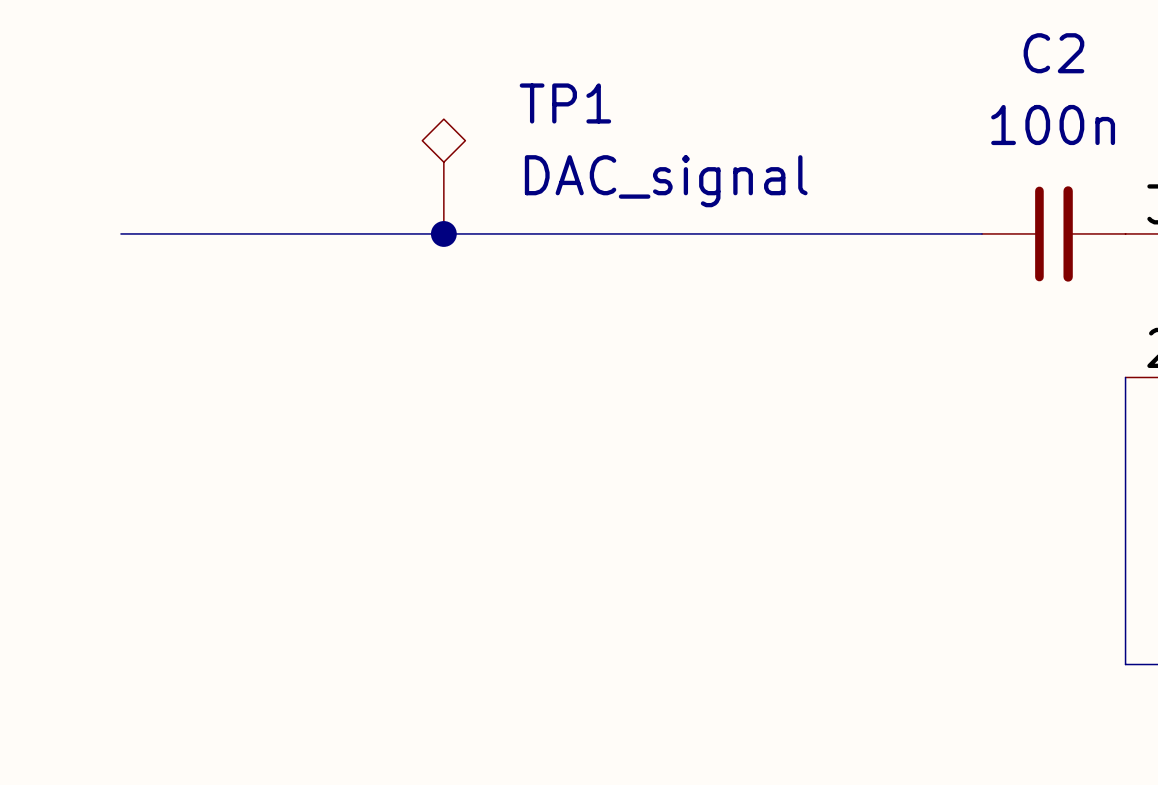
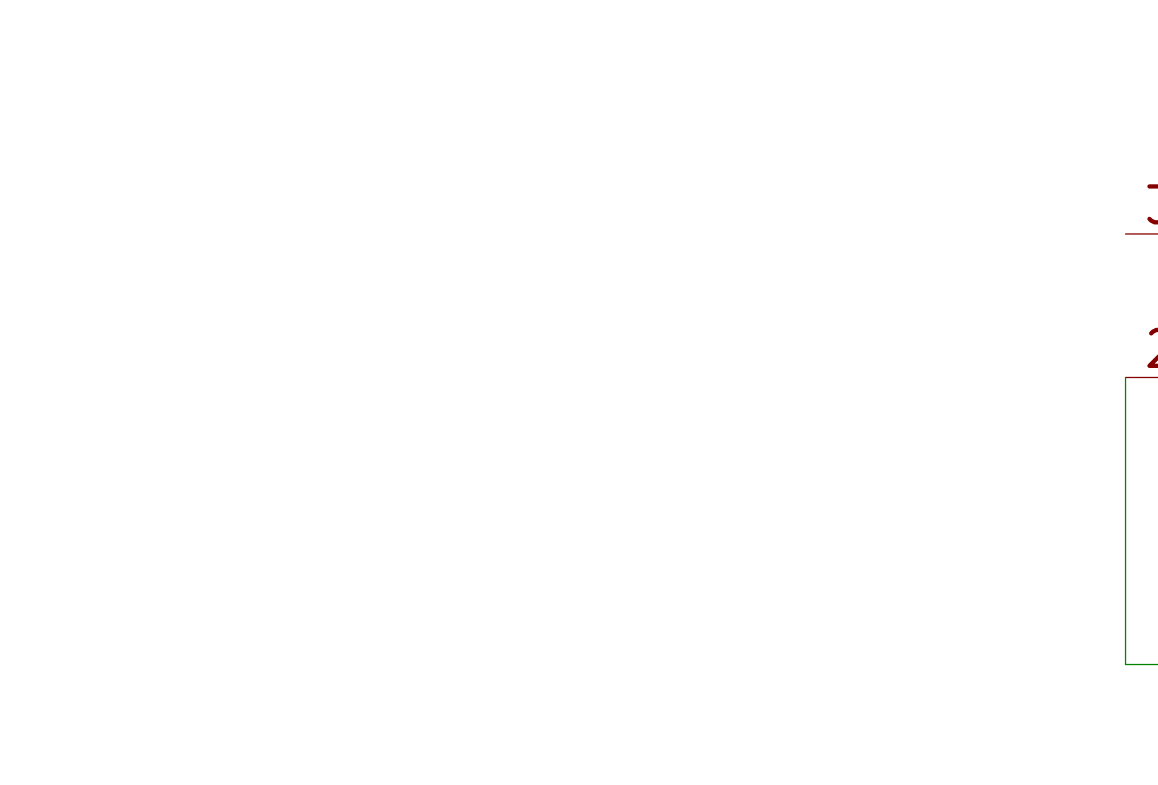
TP1: DAC_signal (443, 176) -> none
wire: (120, 233) (982, 233) -> none
junction: (443, 233) -> none
C2: 100n (1053, 233) -> none

